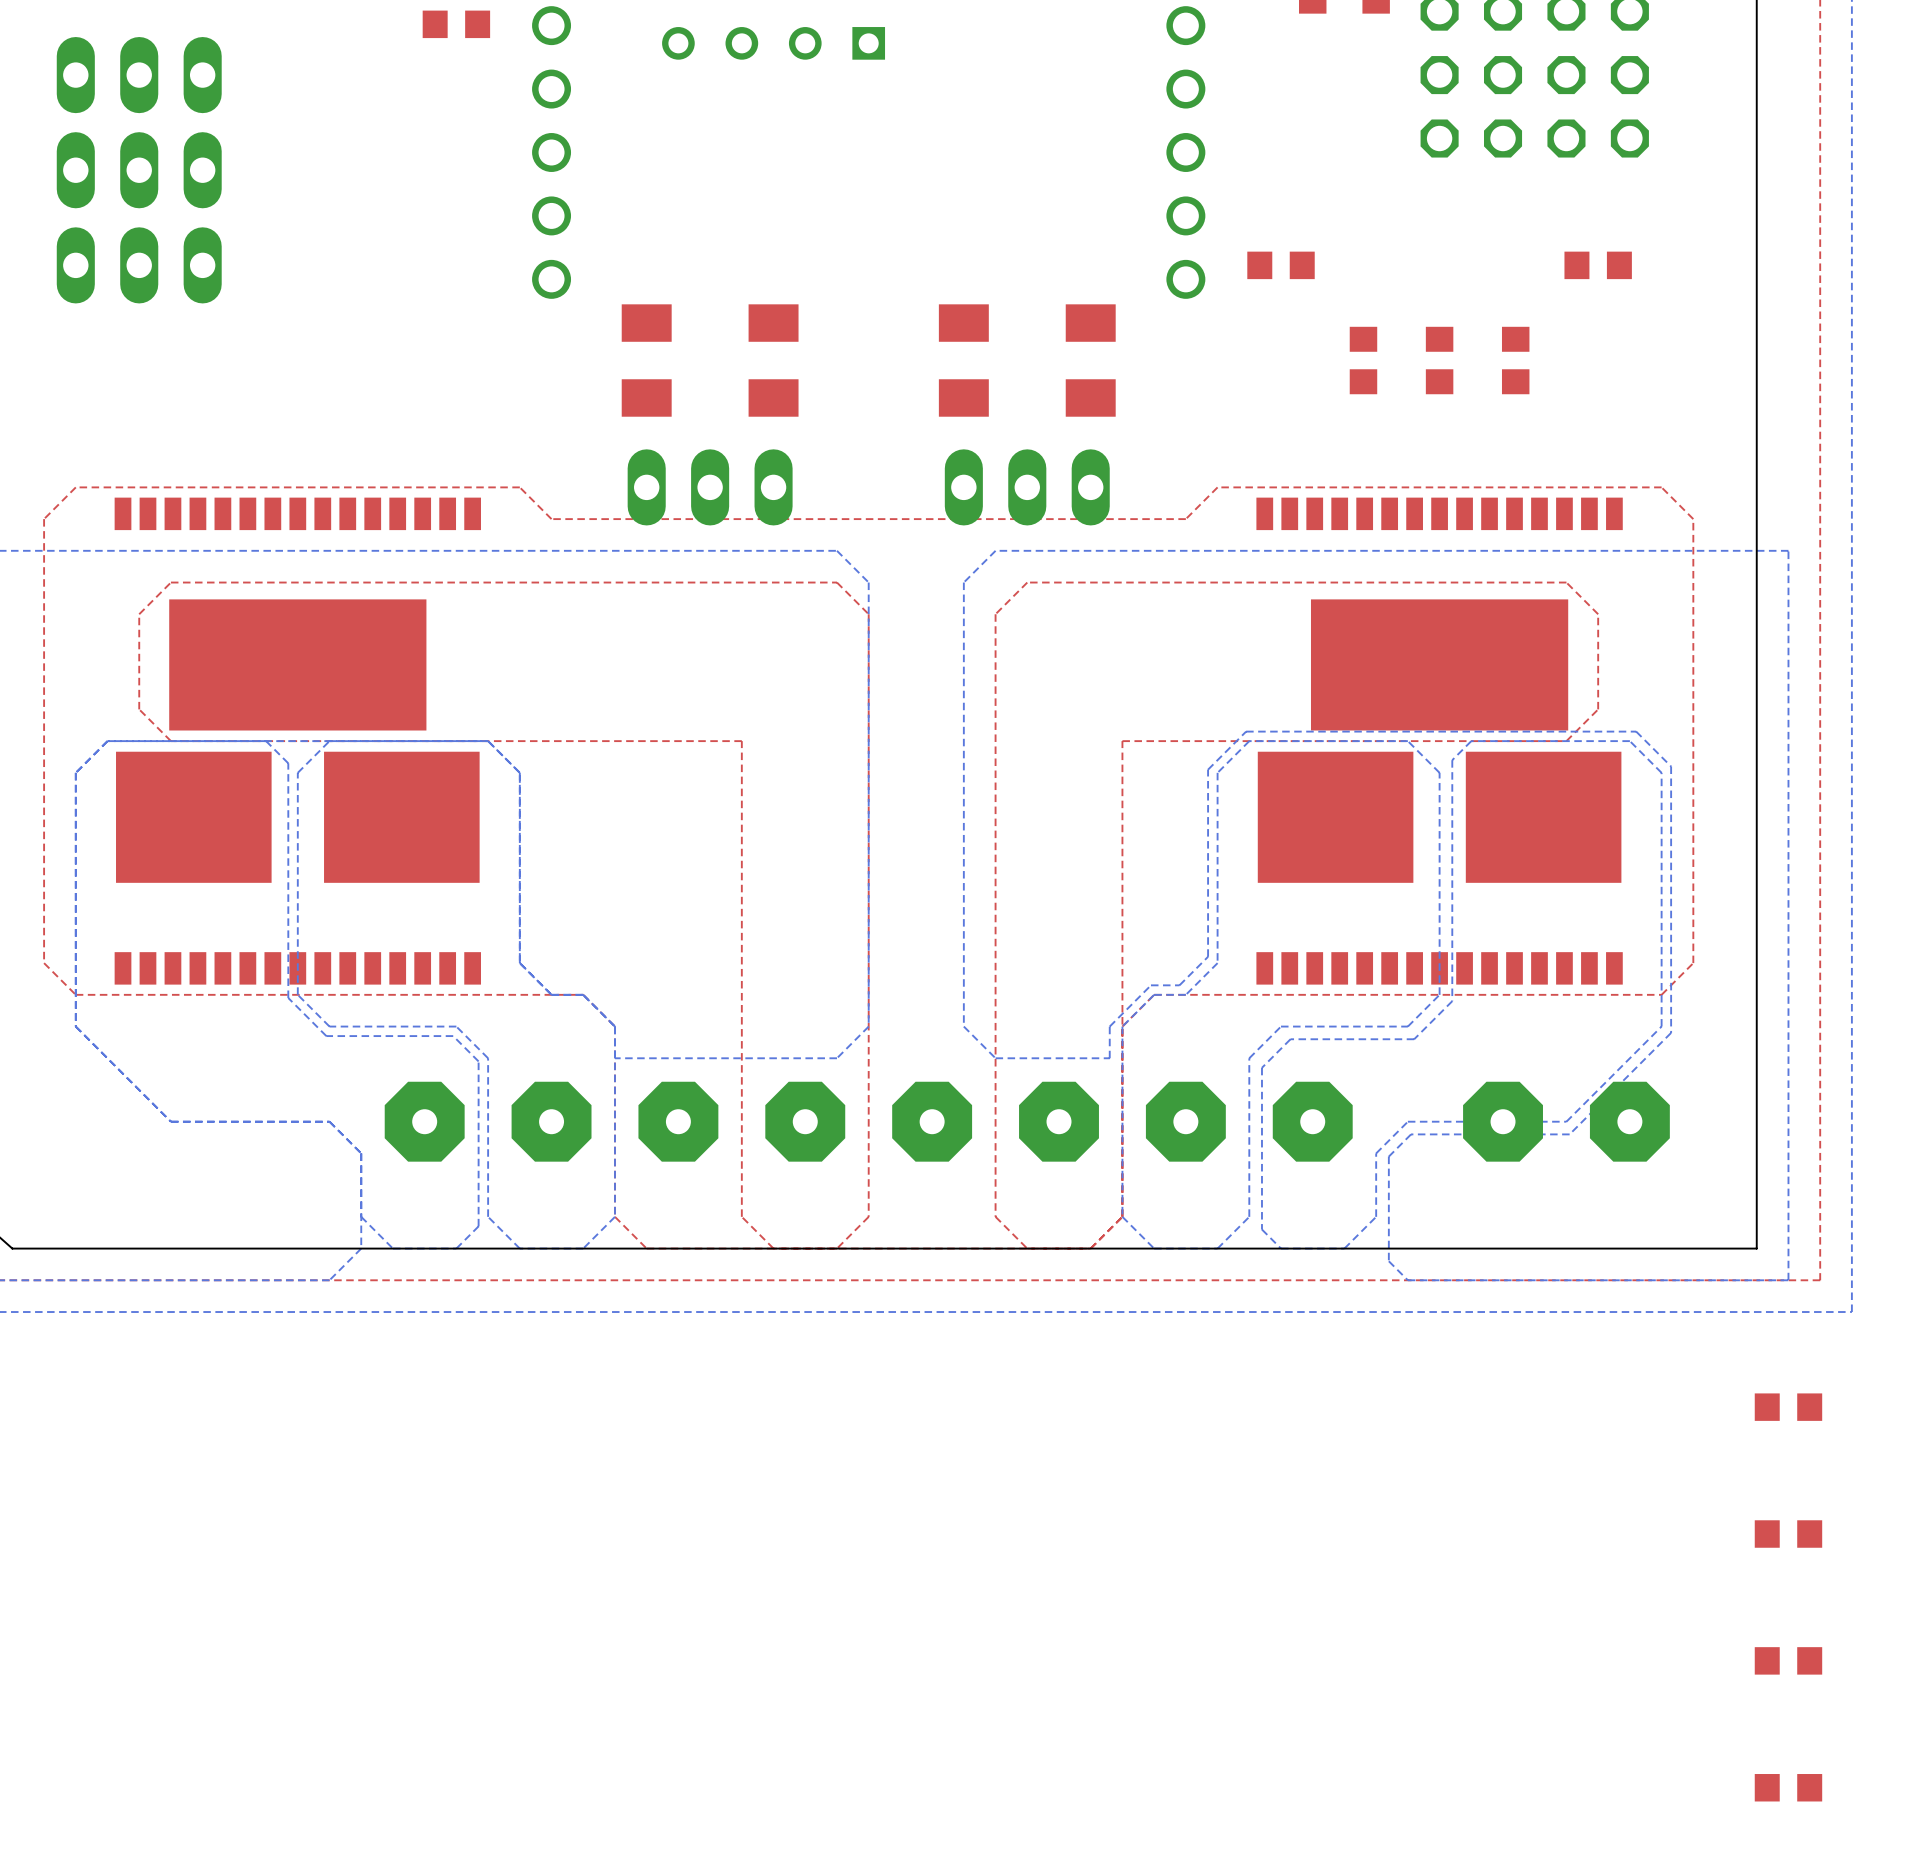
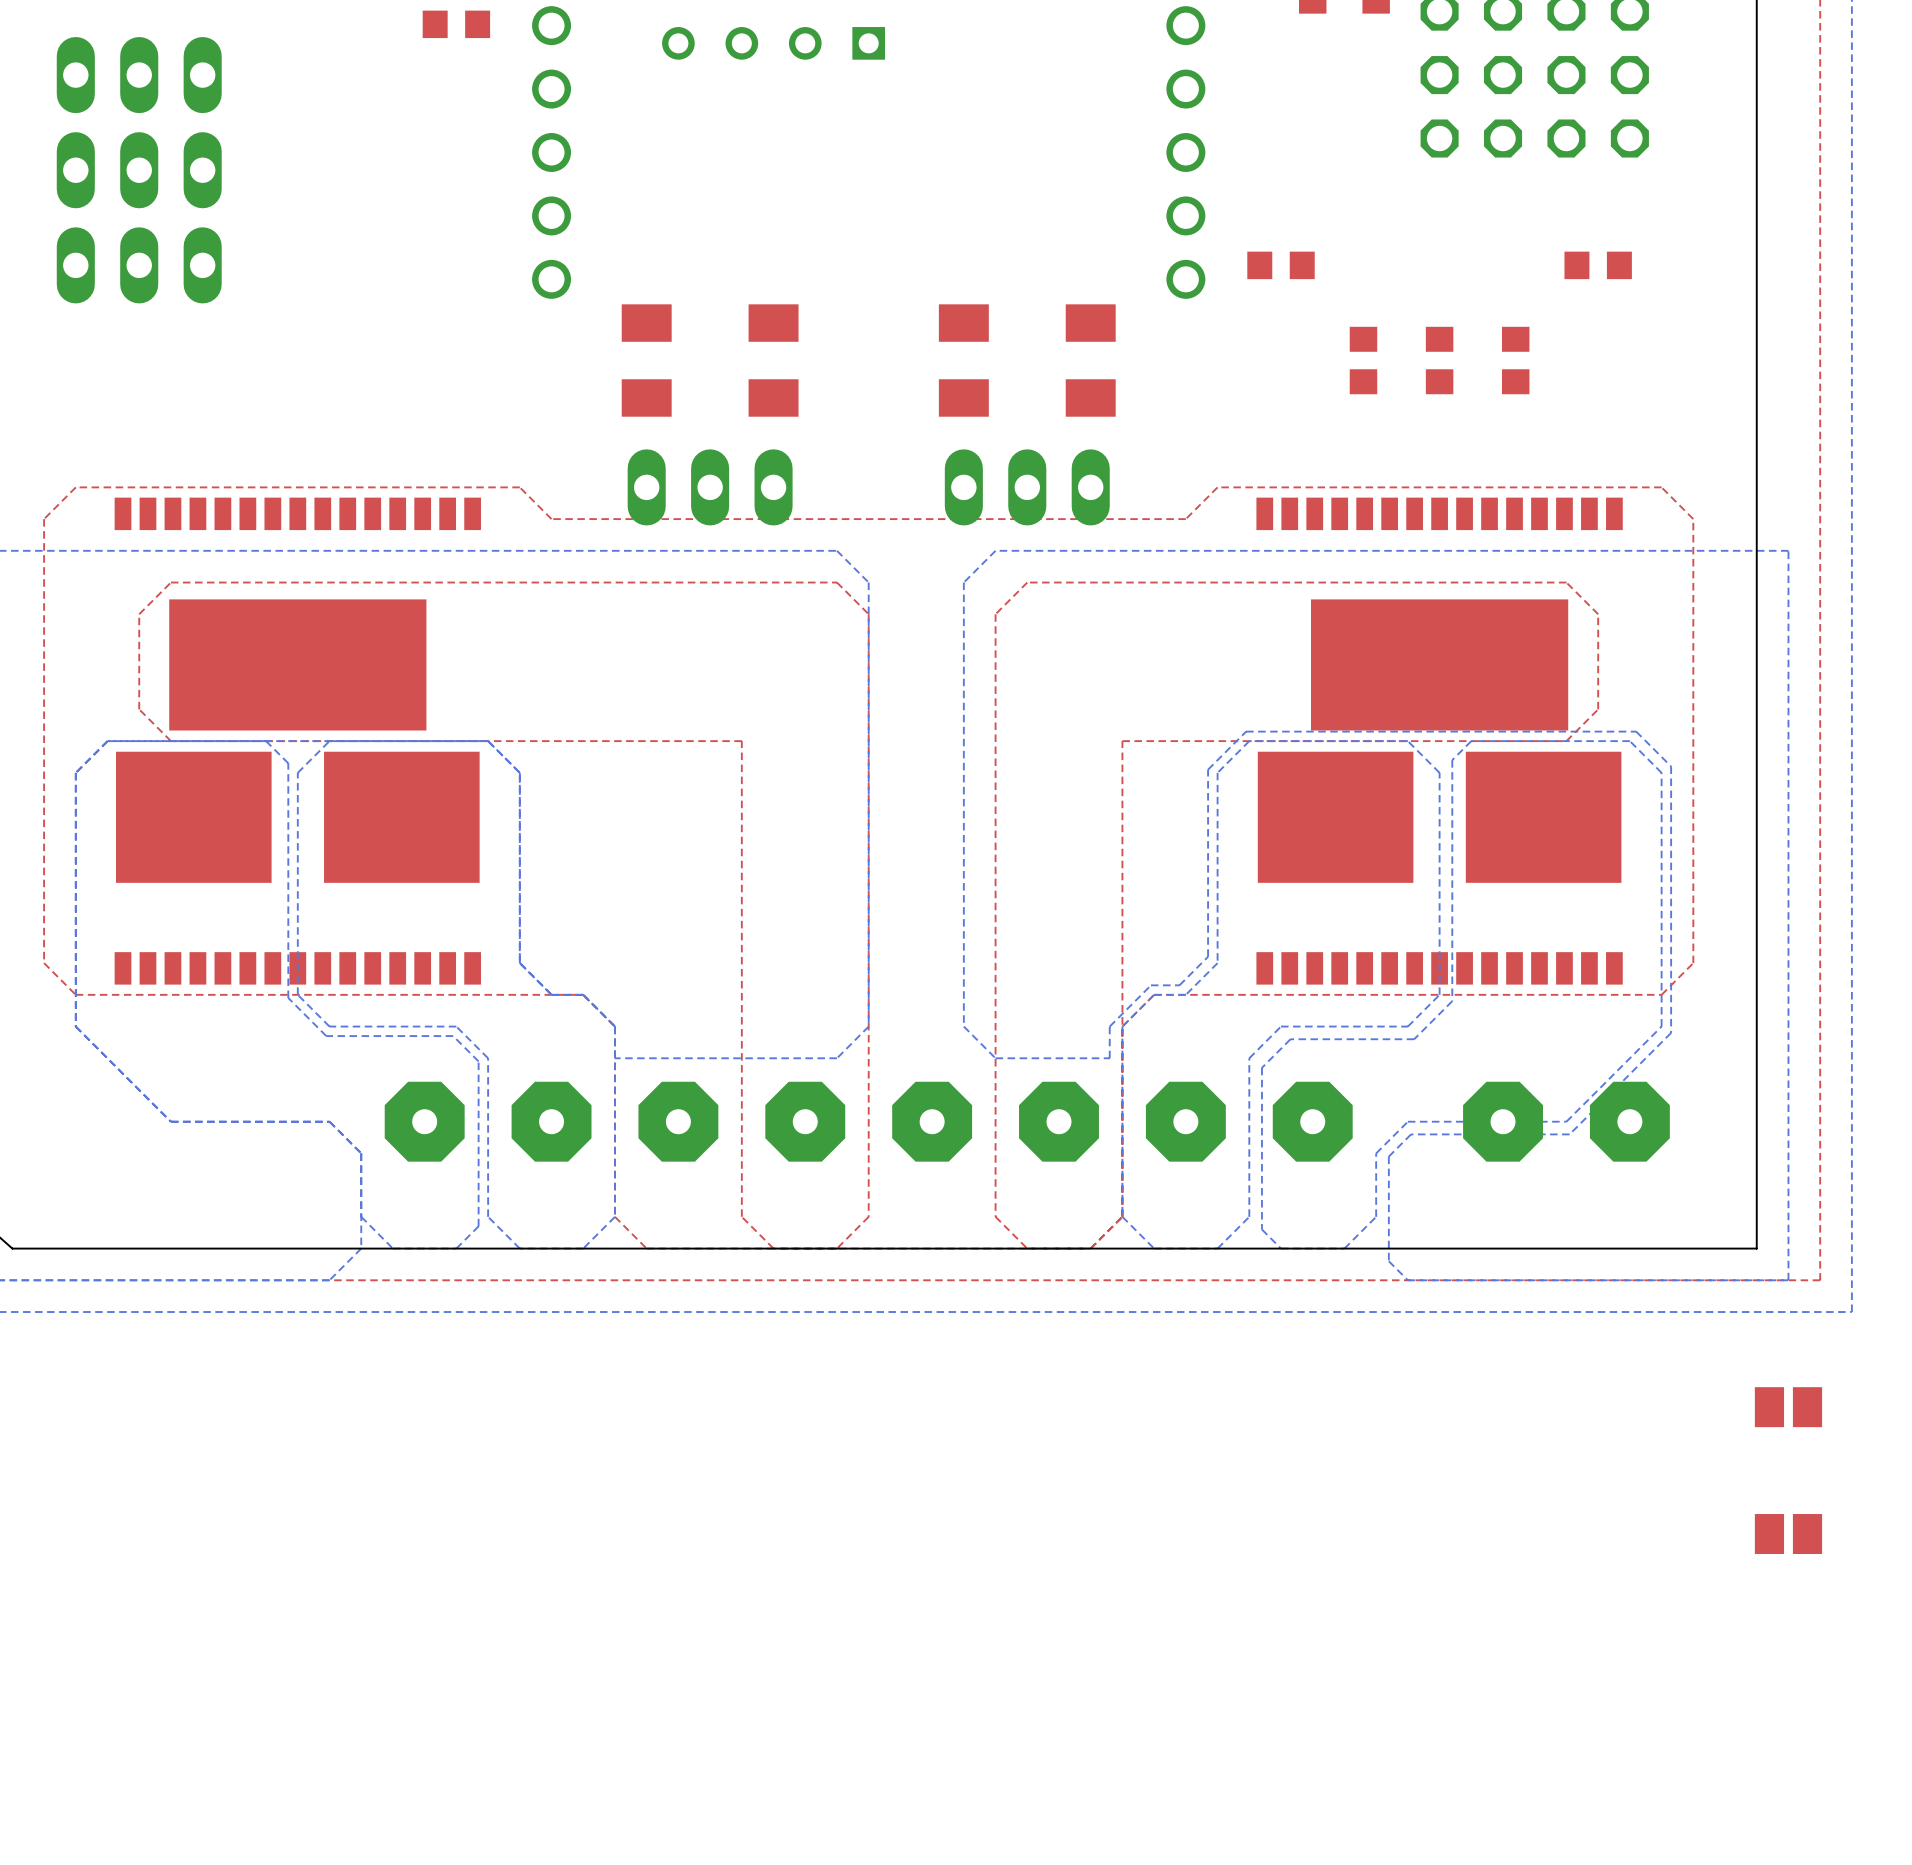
part footprint: [1754, 1393, 1823, 1421] -> [1754, 1387, 1823, 1428]
part footprint: [1754, 1520, 1823, 1548] -> [1754, 1514, 1823, 1555]
part: (1788, 1660) -> none
part: (1788, 1787) -> none

